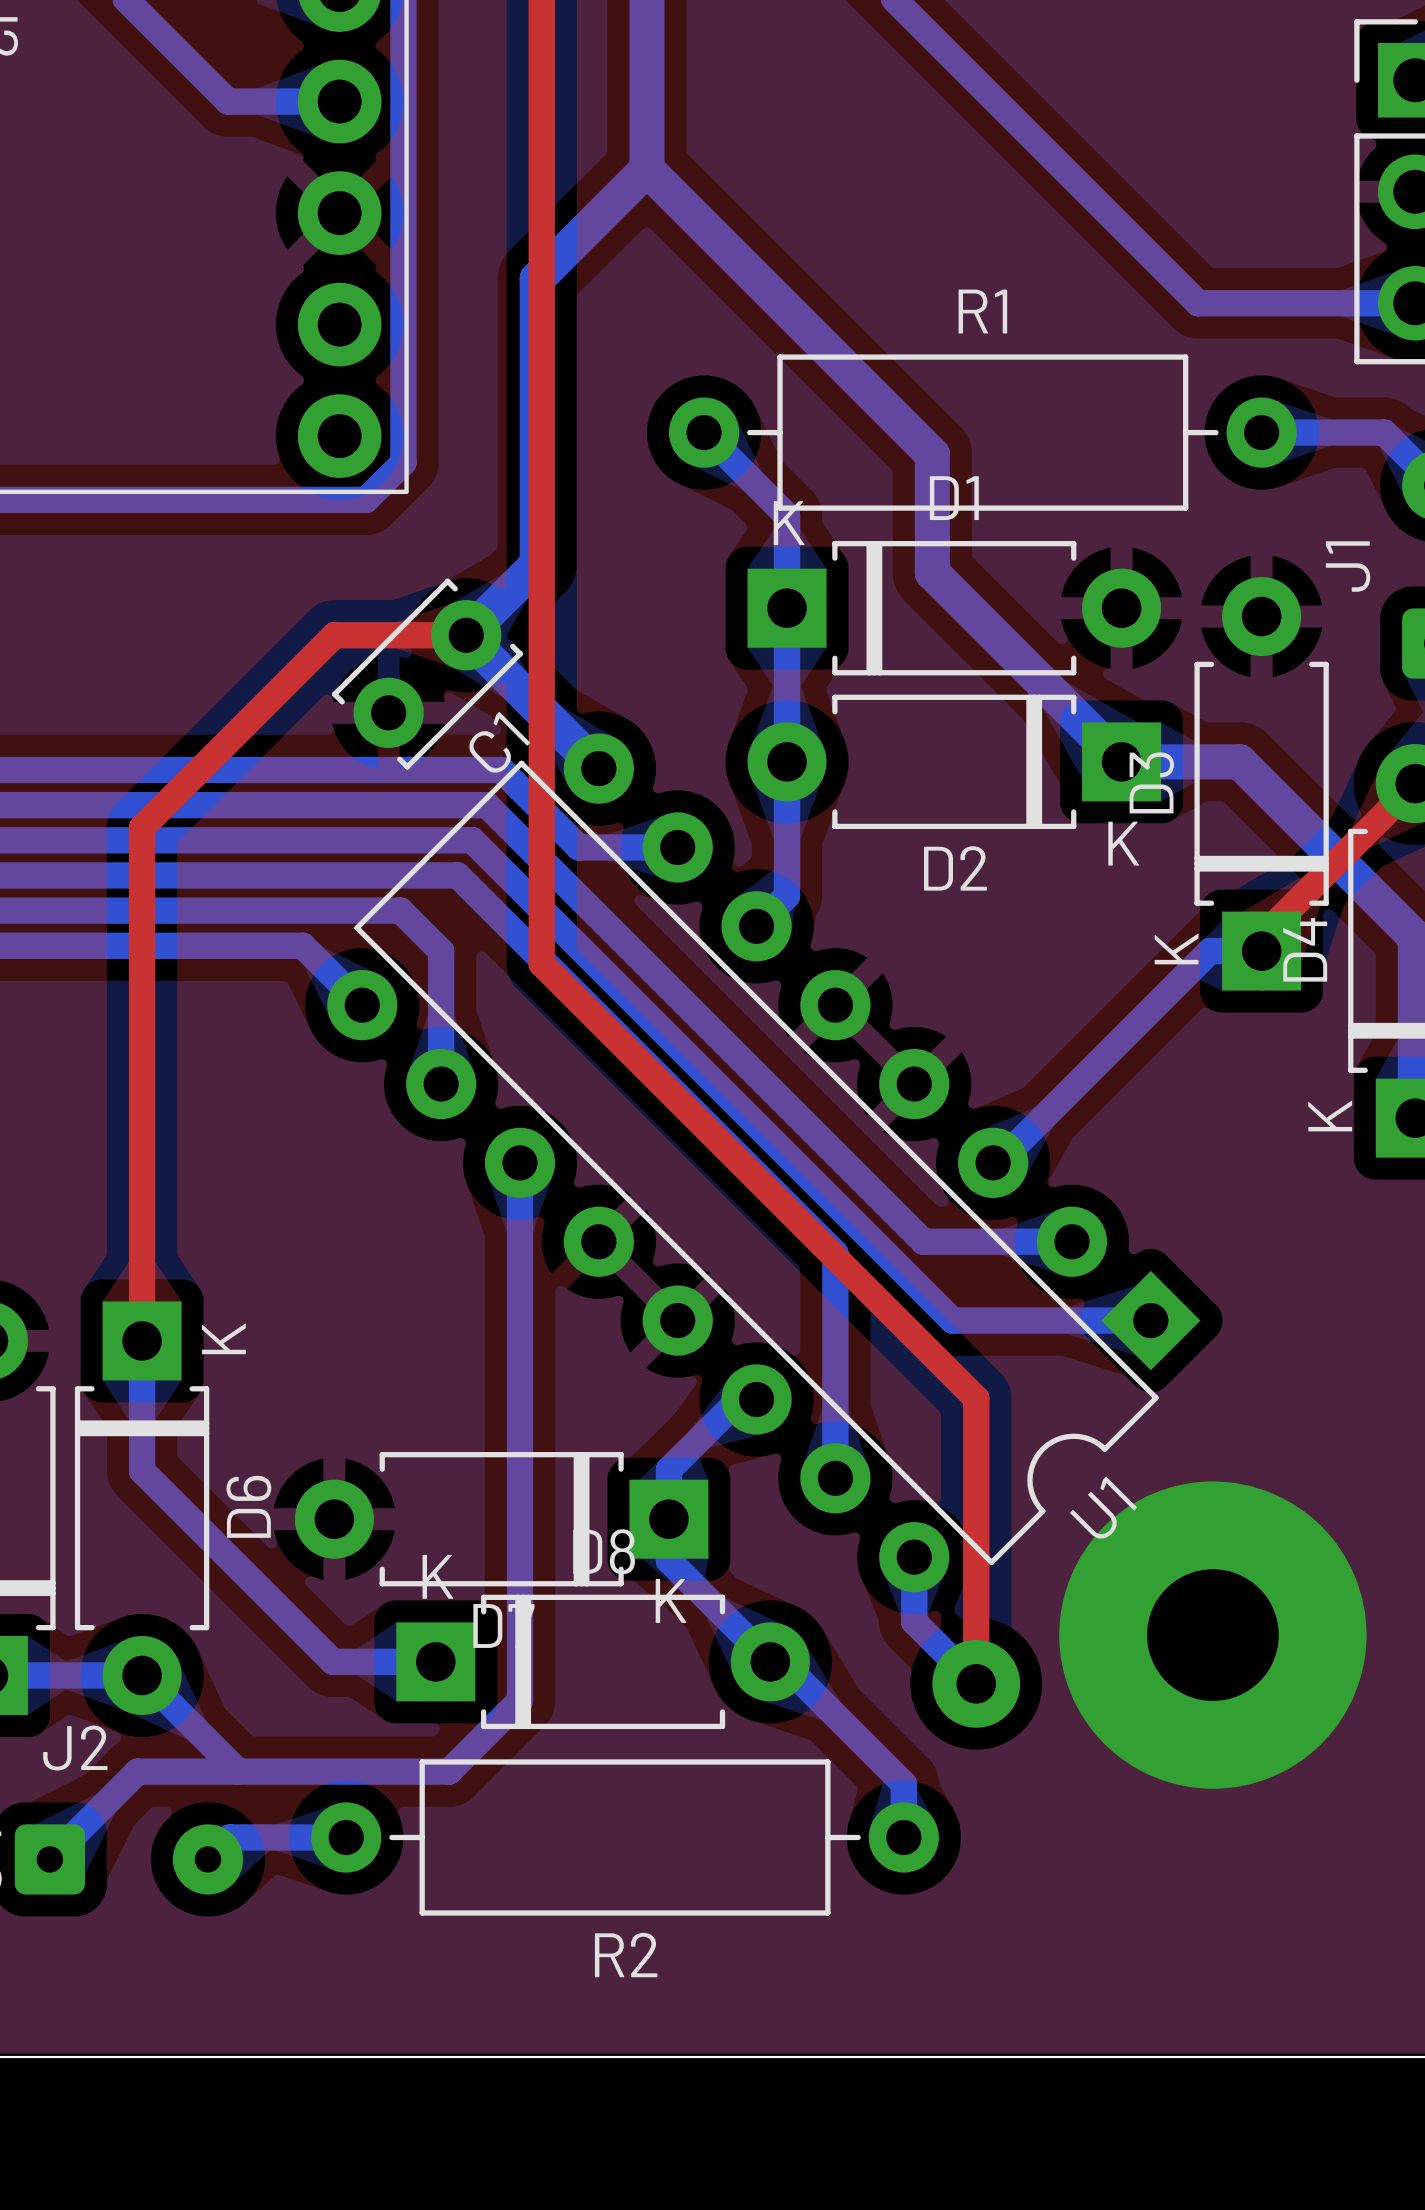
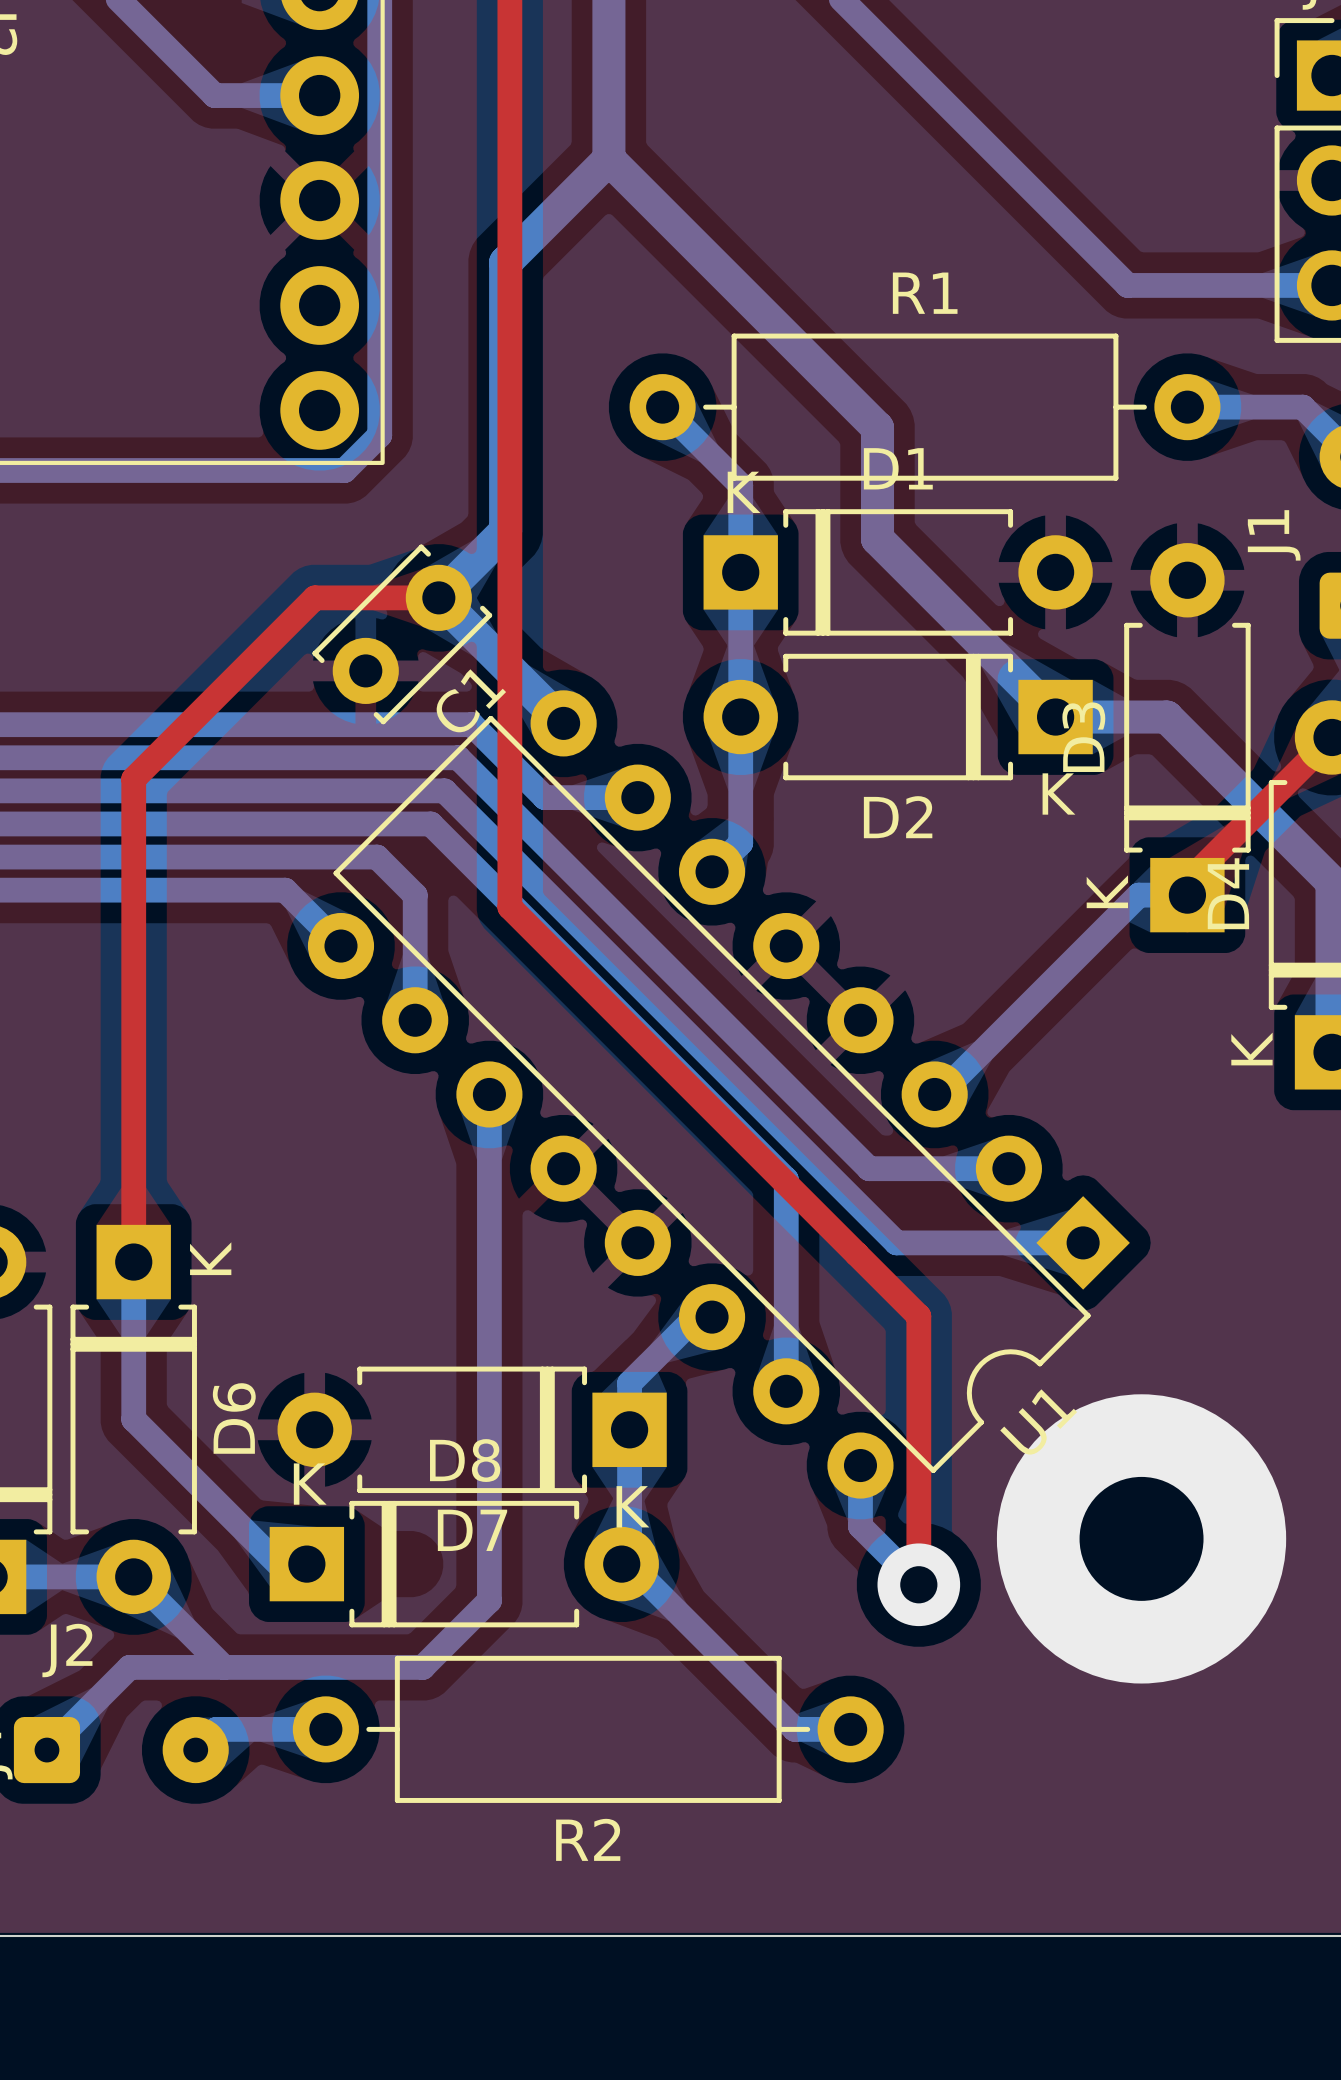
bottom track: (142, 1470) (333, 1661) (435, 1661) -> (133, 1384) (133, 1419) (278, 1564)
bottom track: (668, 1560) (770, 1661) (781, 1661) (903, 1783) (903, 1837) -> (629, 1468) (629, 1564) (794, 1729) (850, 1729)
D8 position: (603, 1661) -> (464, 1564)

